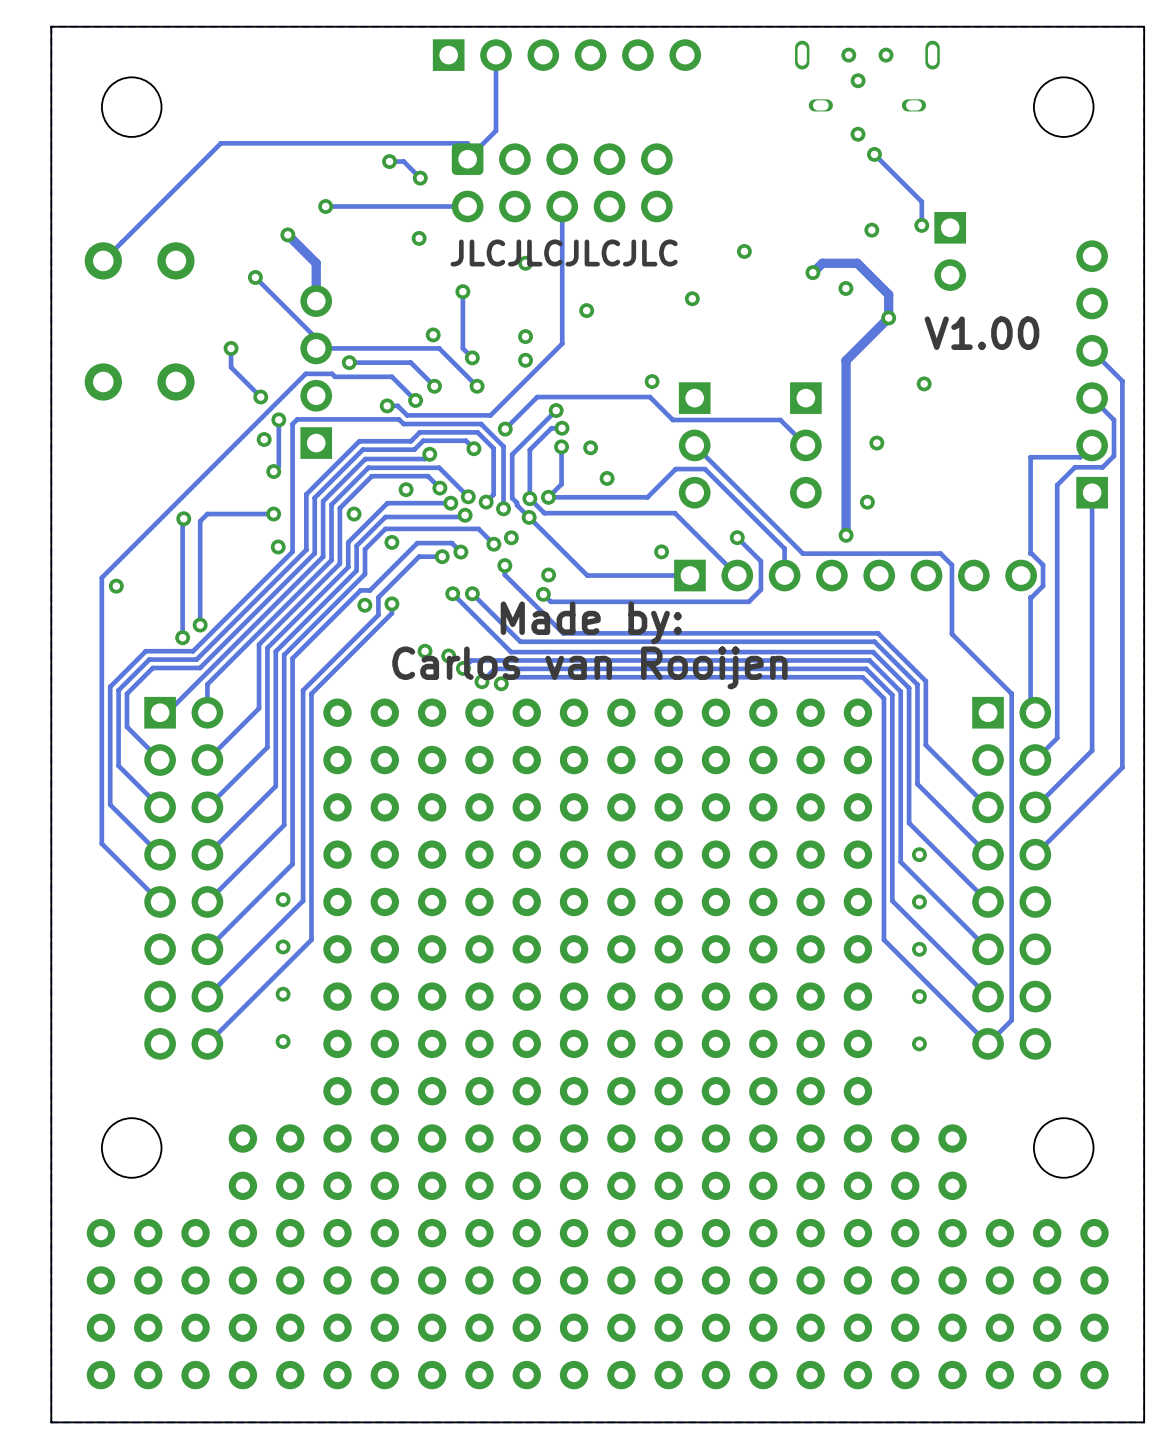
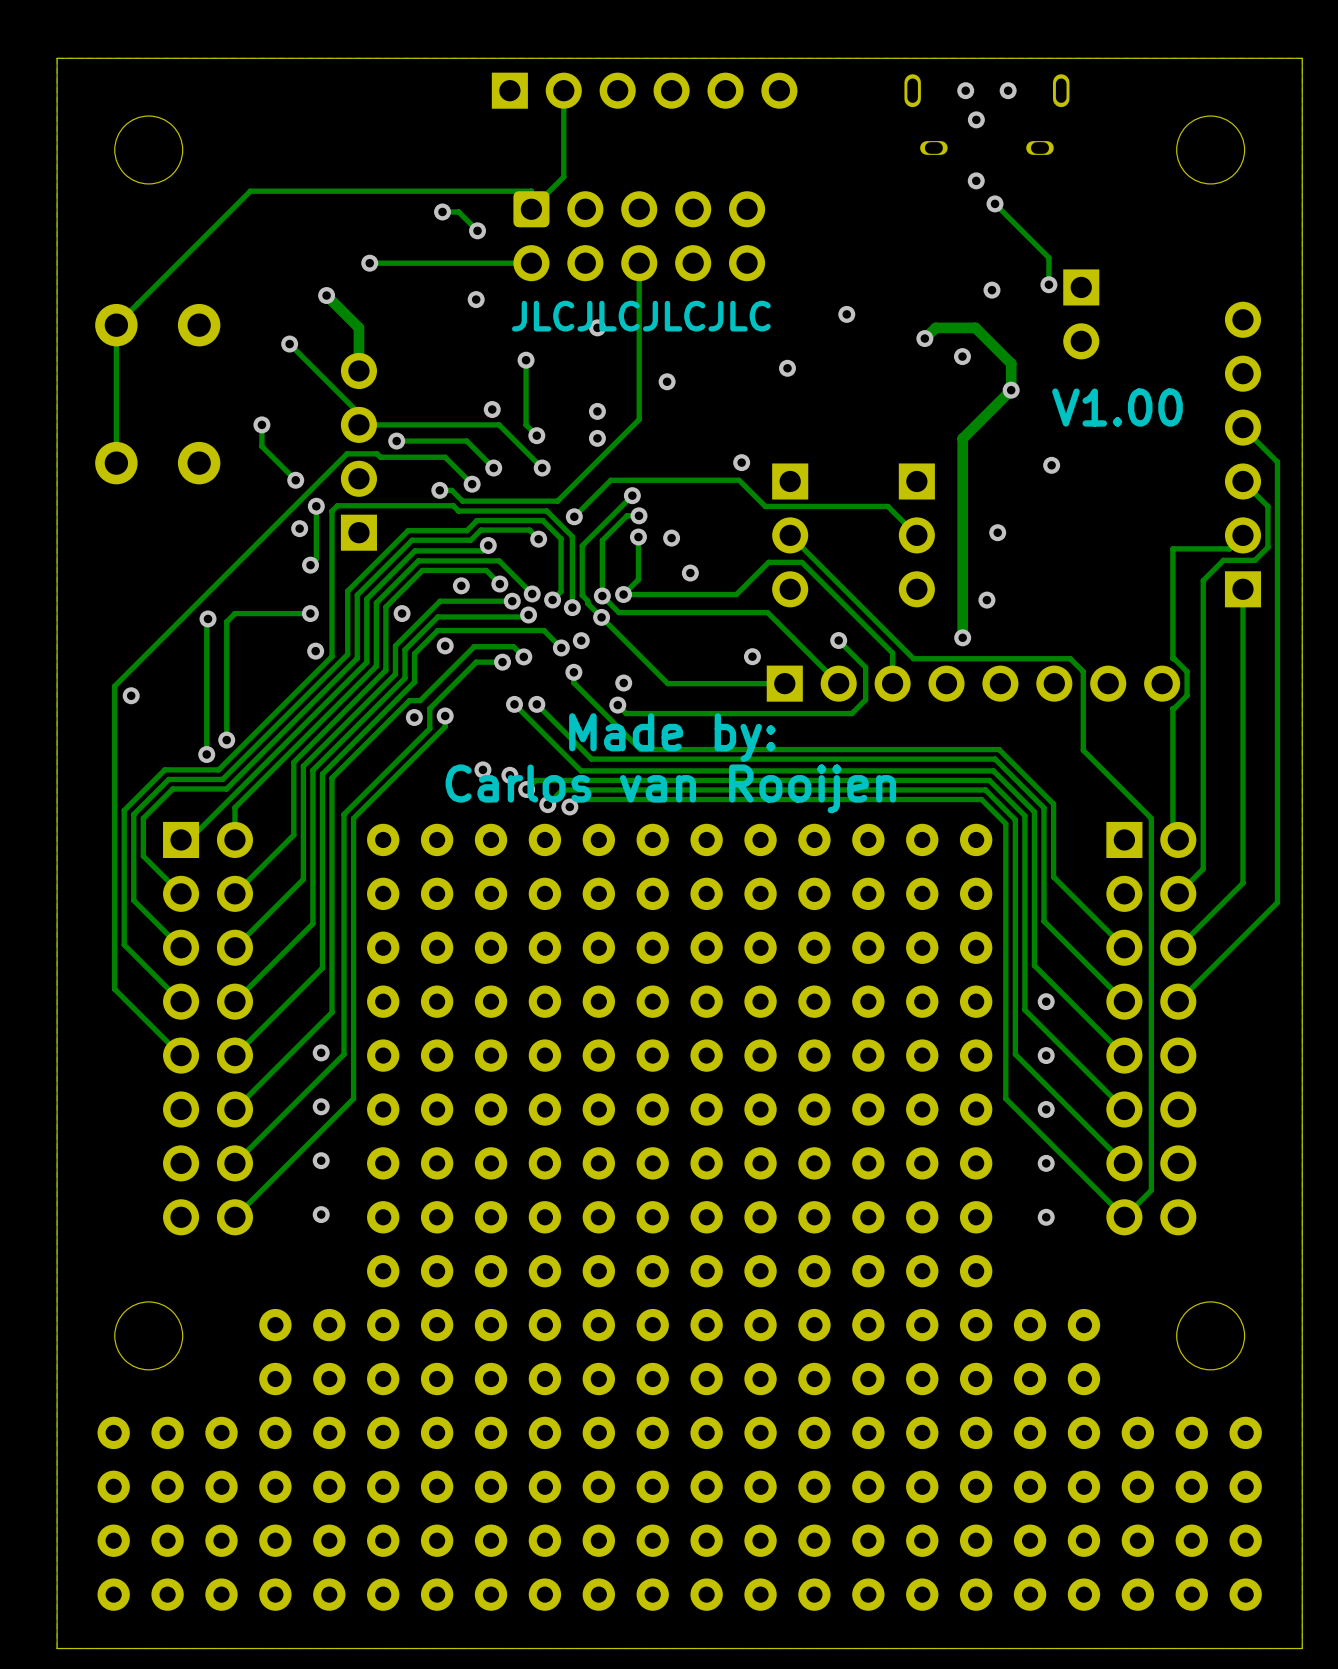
track: none -> (116, 325) (116, 463)

